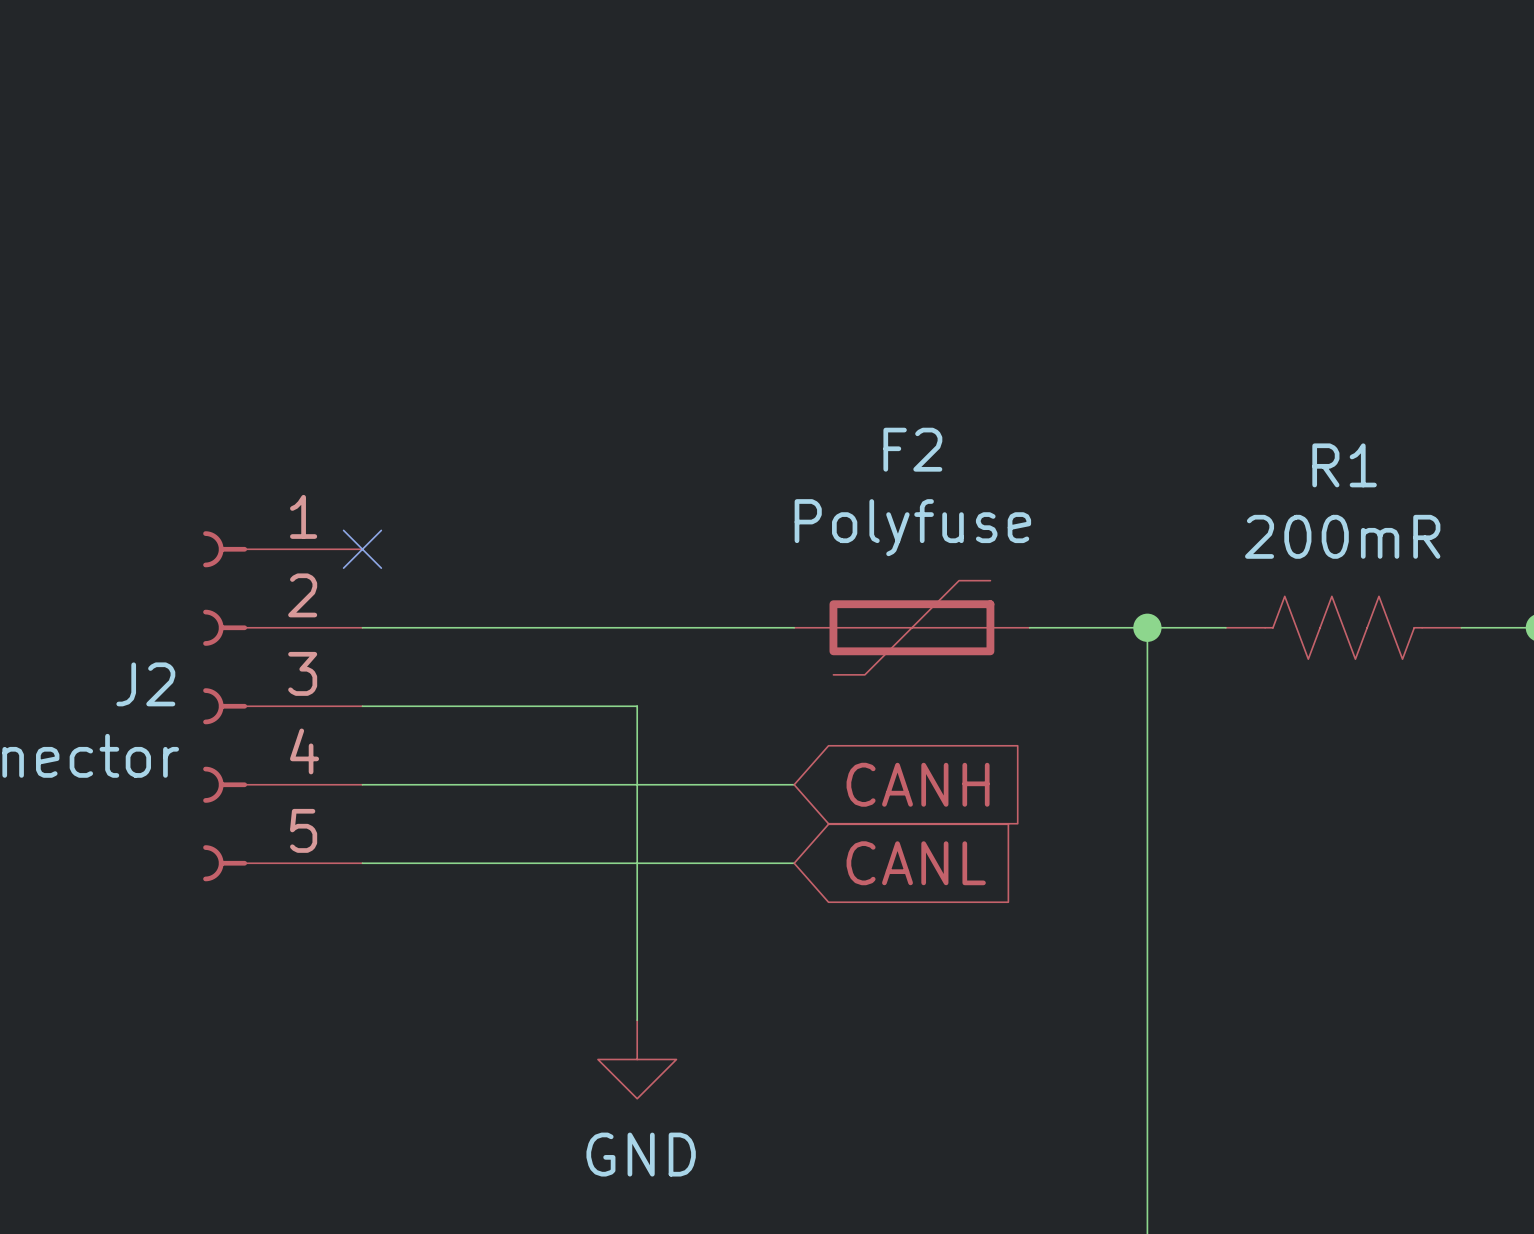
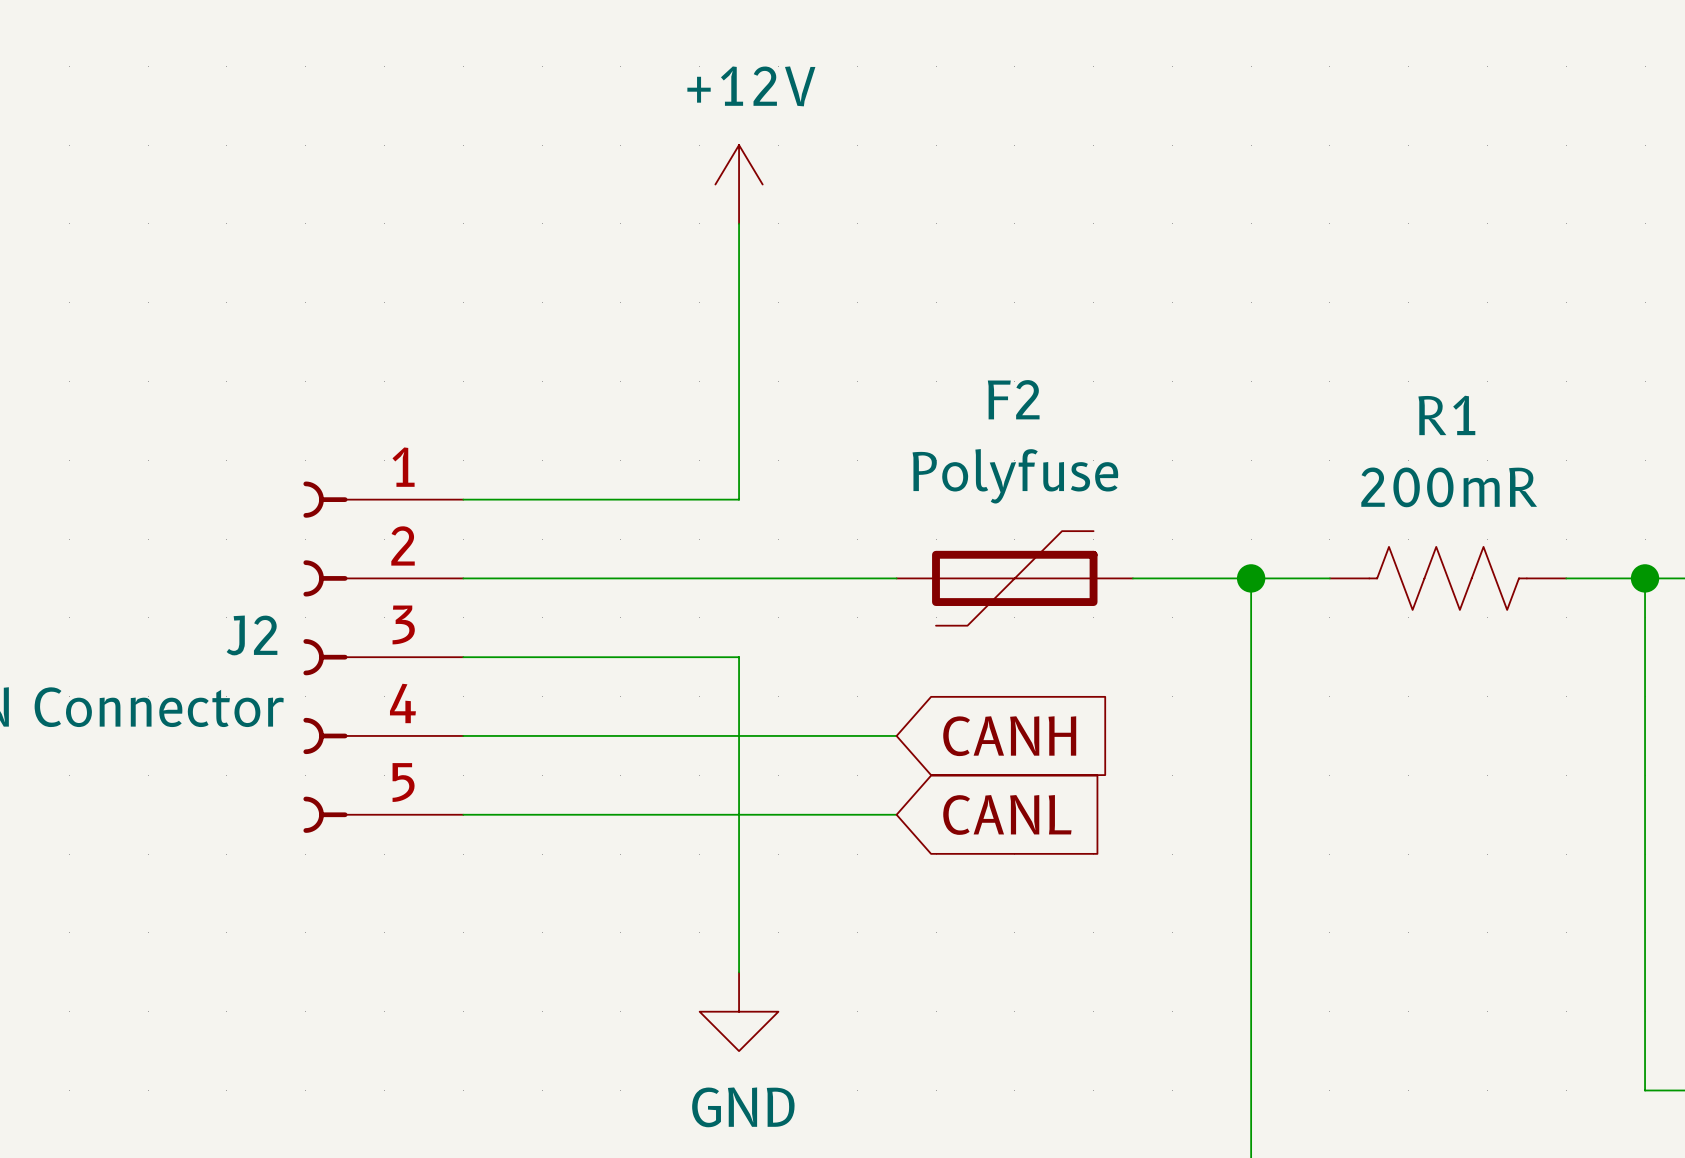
power symbol: none -> +12V (739, 184)
wire: none -> (739, 223) (739, 499) (463, 499)
no-connect mark: (362, 549) -> none

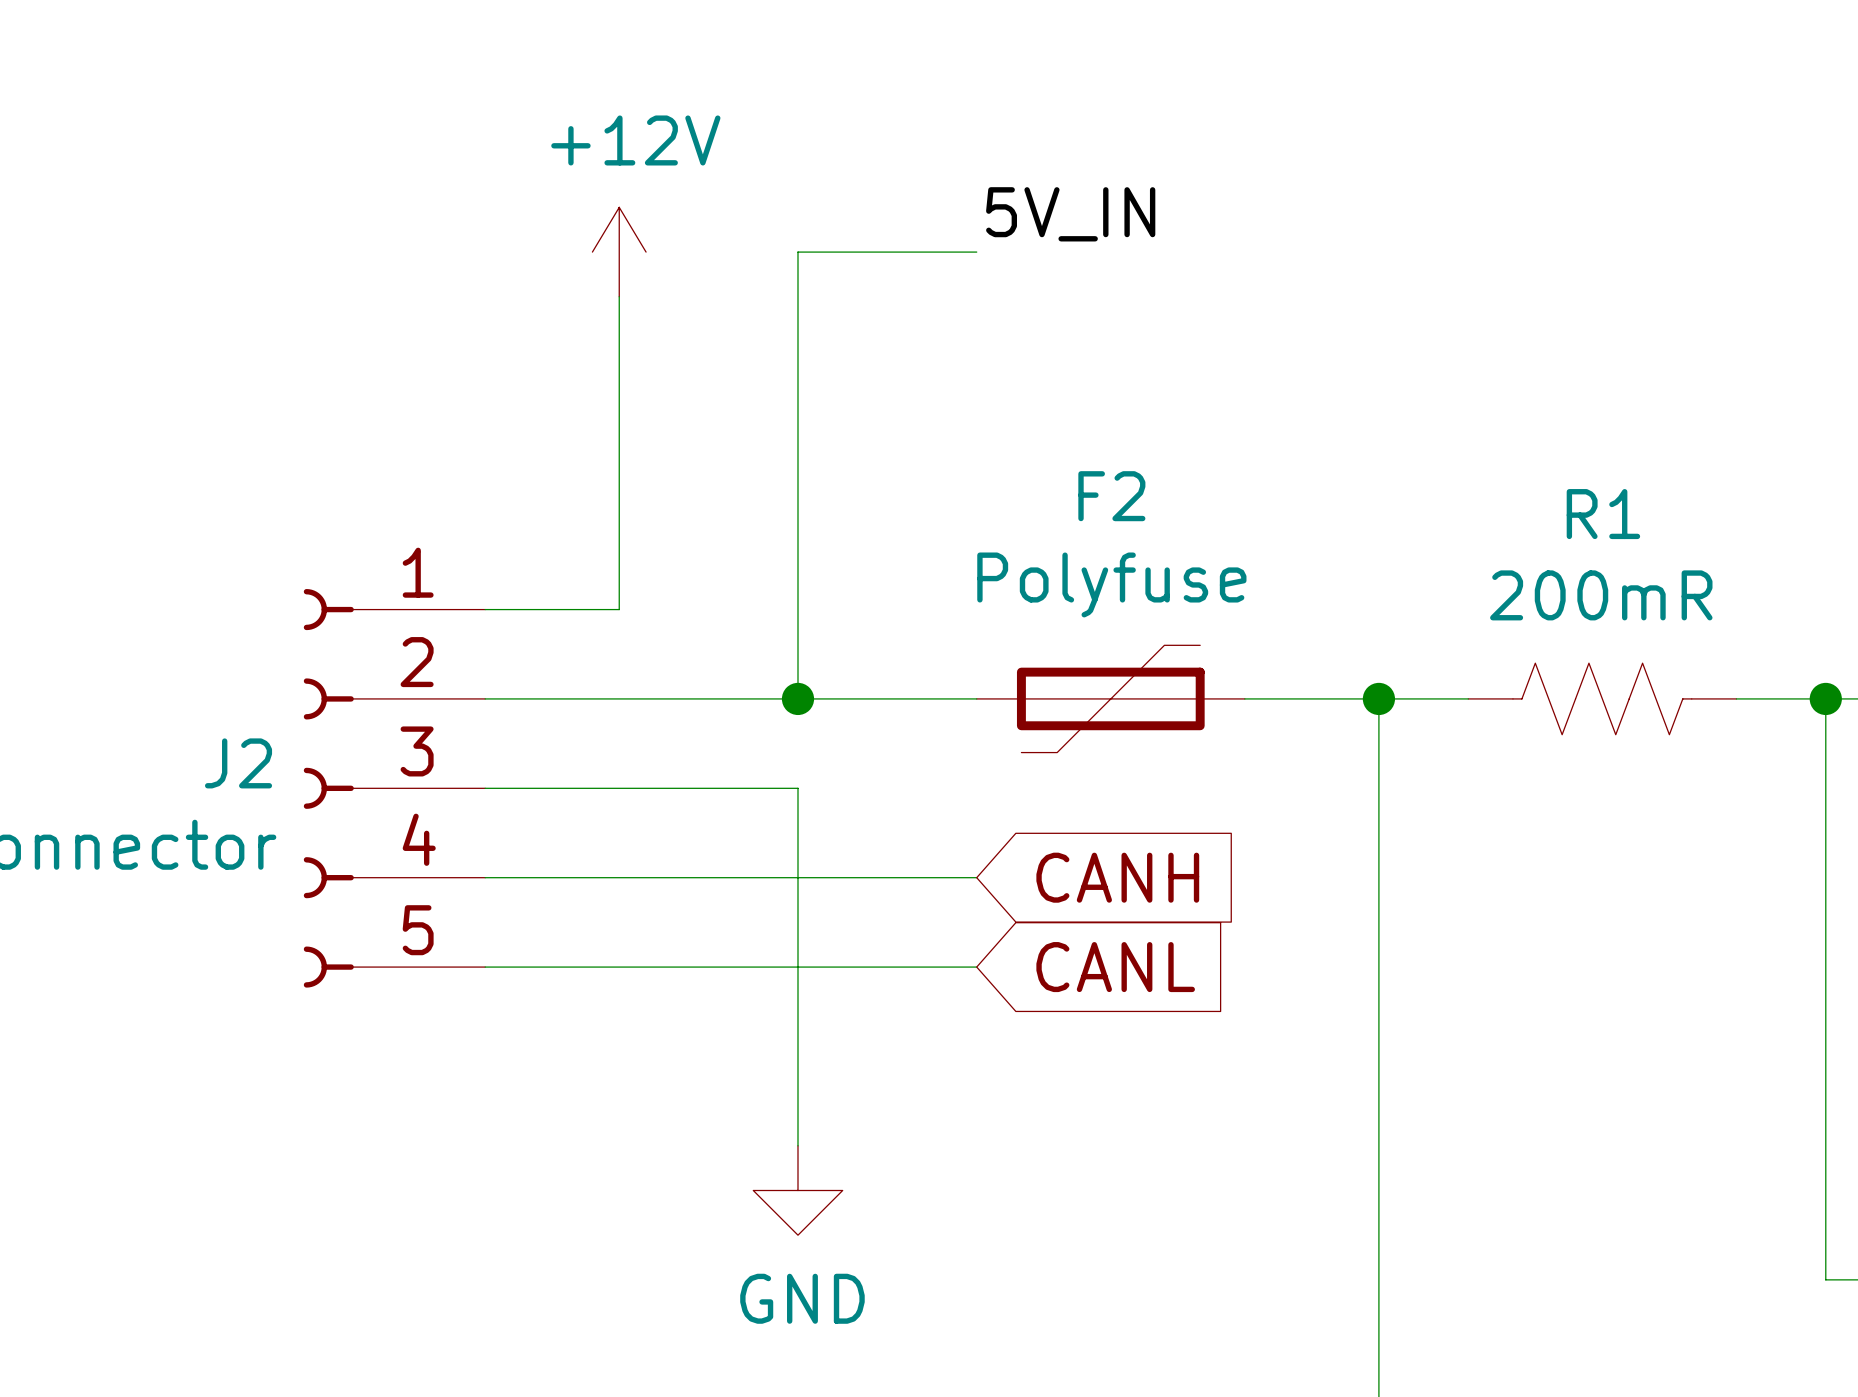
label: none -> 5V_IN (1070, 214)
power symbol position: +12V (739, 184) -> +12V (619, 252)
wire: none -> (976, 252) (797, 252) (797, 296)
wire: none -> (619, 296) (619, 609)
wire: (581, 499) (739, 499) -> (797, 698) (797, 609)
junction: none -> (797, 698)

